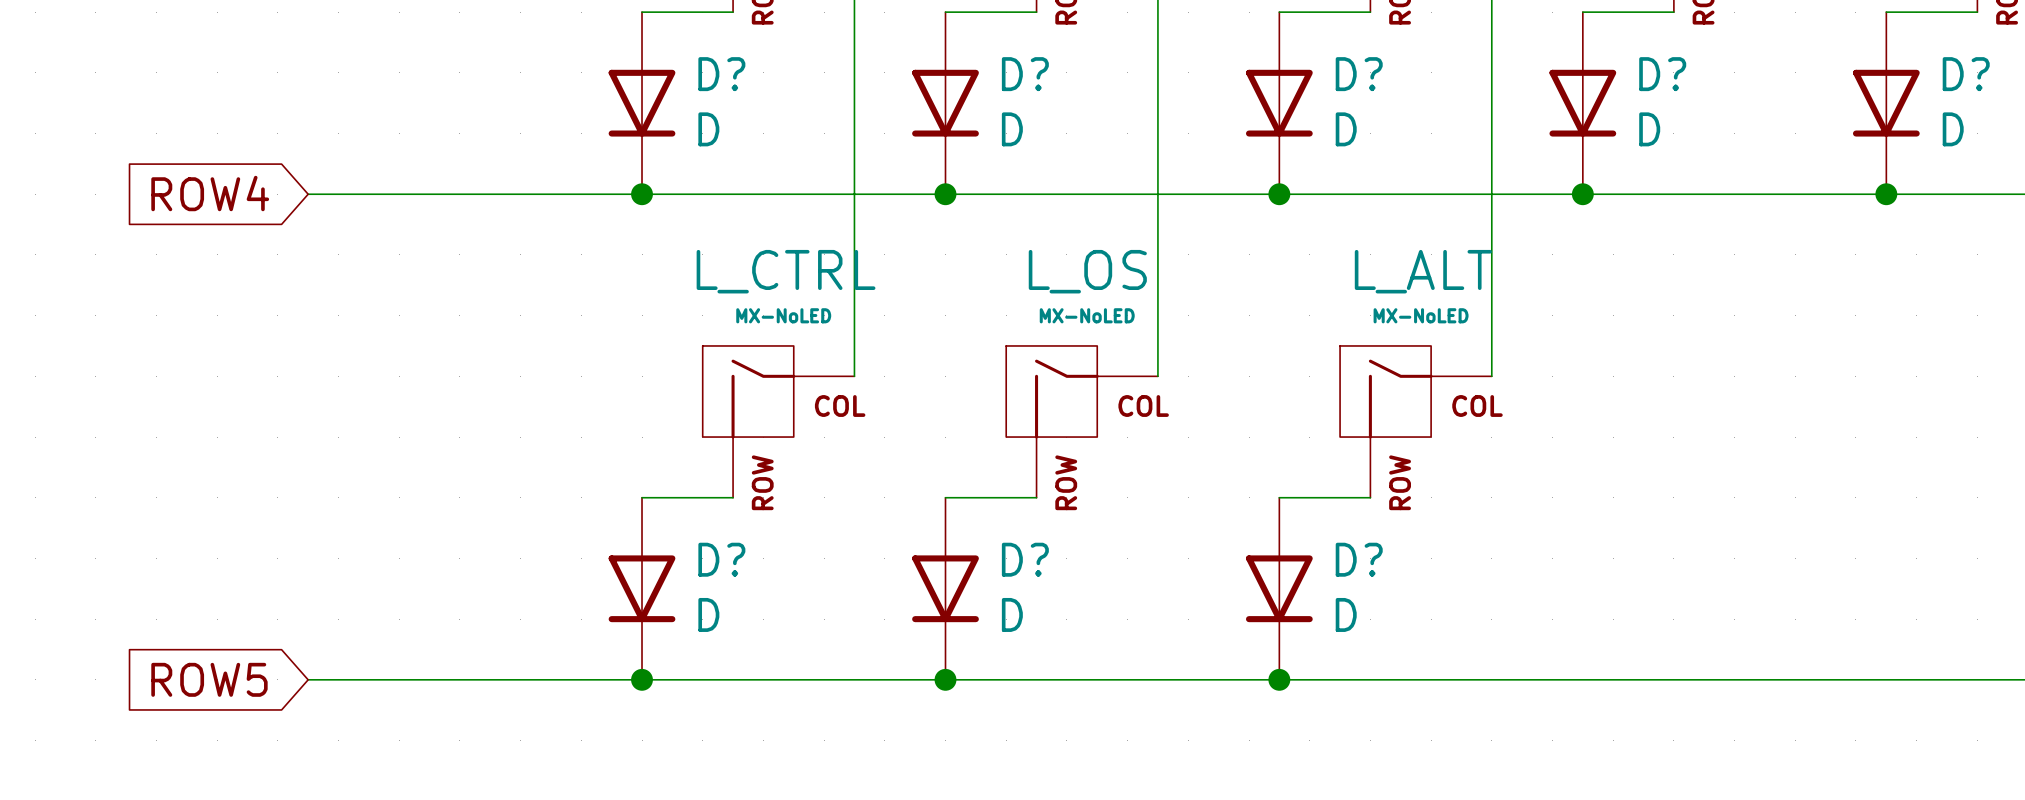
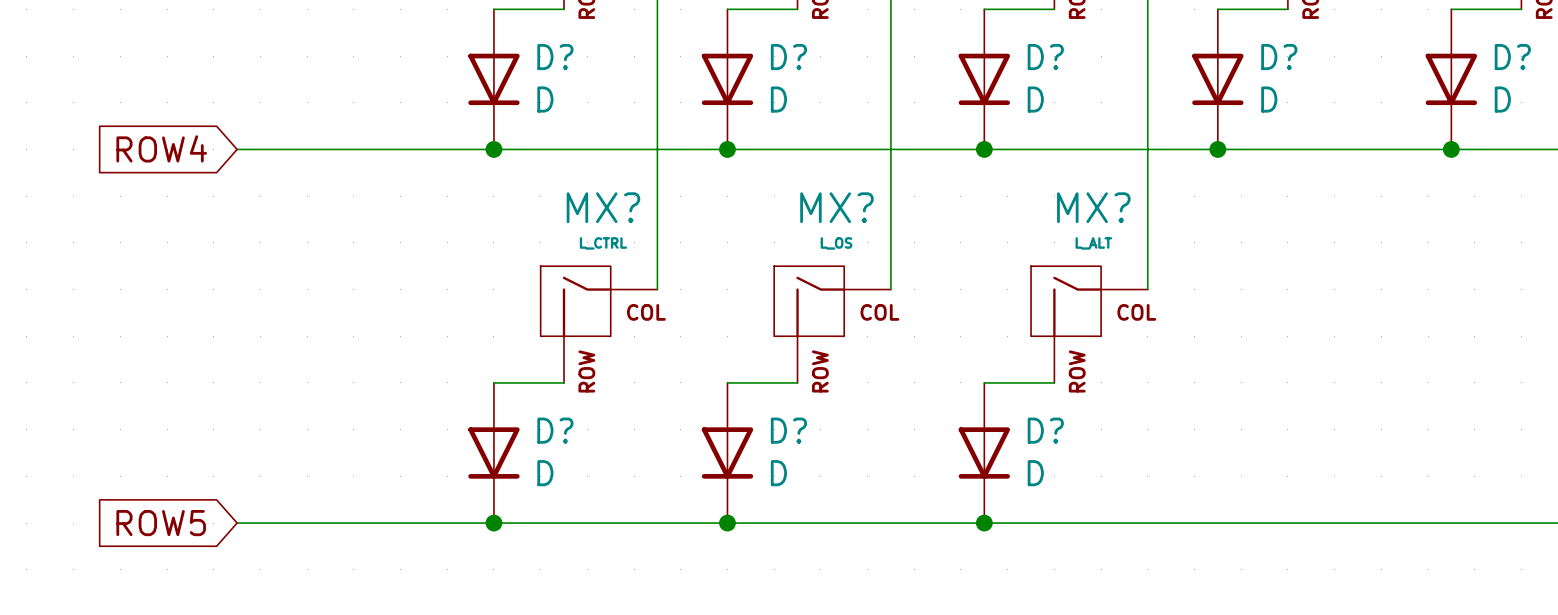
L_CTRL name: L_CTRL (786, 271) -> MX? (603, 207)
L_OS name: L_OS (1087, 271) -> MX? (836, 207)
L_ALT name: L_ALT (1423, 271) -> MX? (1093, 207)
L_CTRL value: MX-NoLED (783, 315) -> L_CTRL (603, 243)
L_OS value: MX-NoLED (1087, 315) -> L_OS (836, 243)
L_ALT value: MX-NoLED (1421, 315) -> L_ALT (1093, 243)

